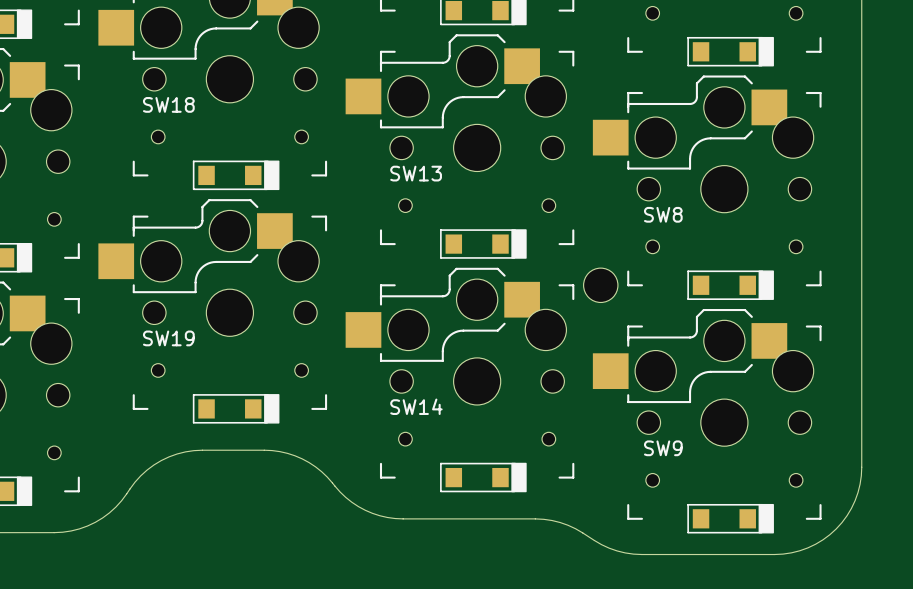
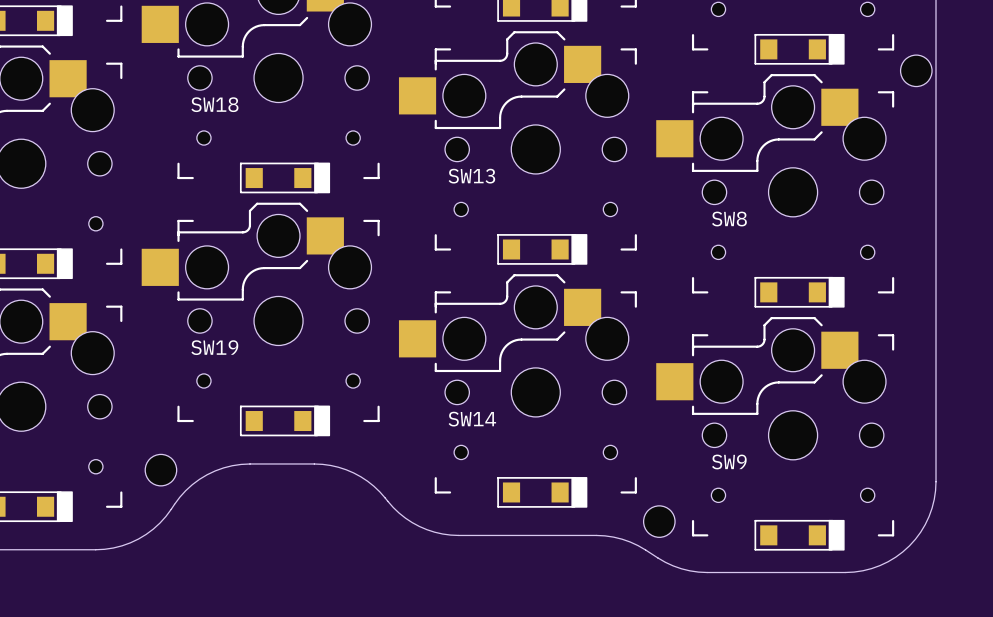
part: none -> (916, 70)
part: (600, 285) -> none
part: none -> (160, 470)
part: none -> (659, 521)

